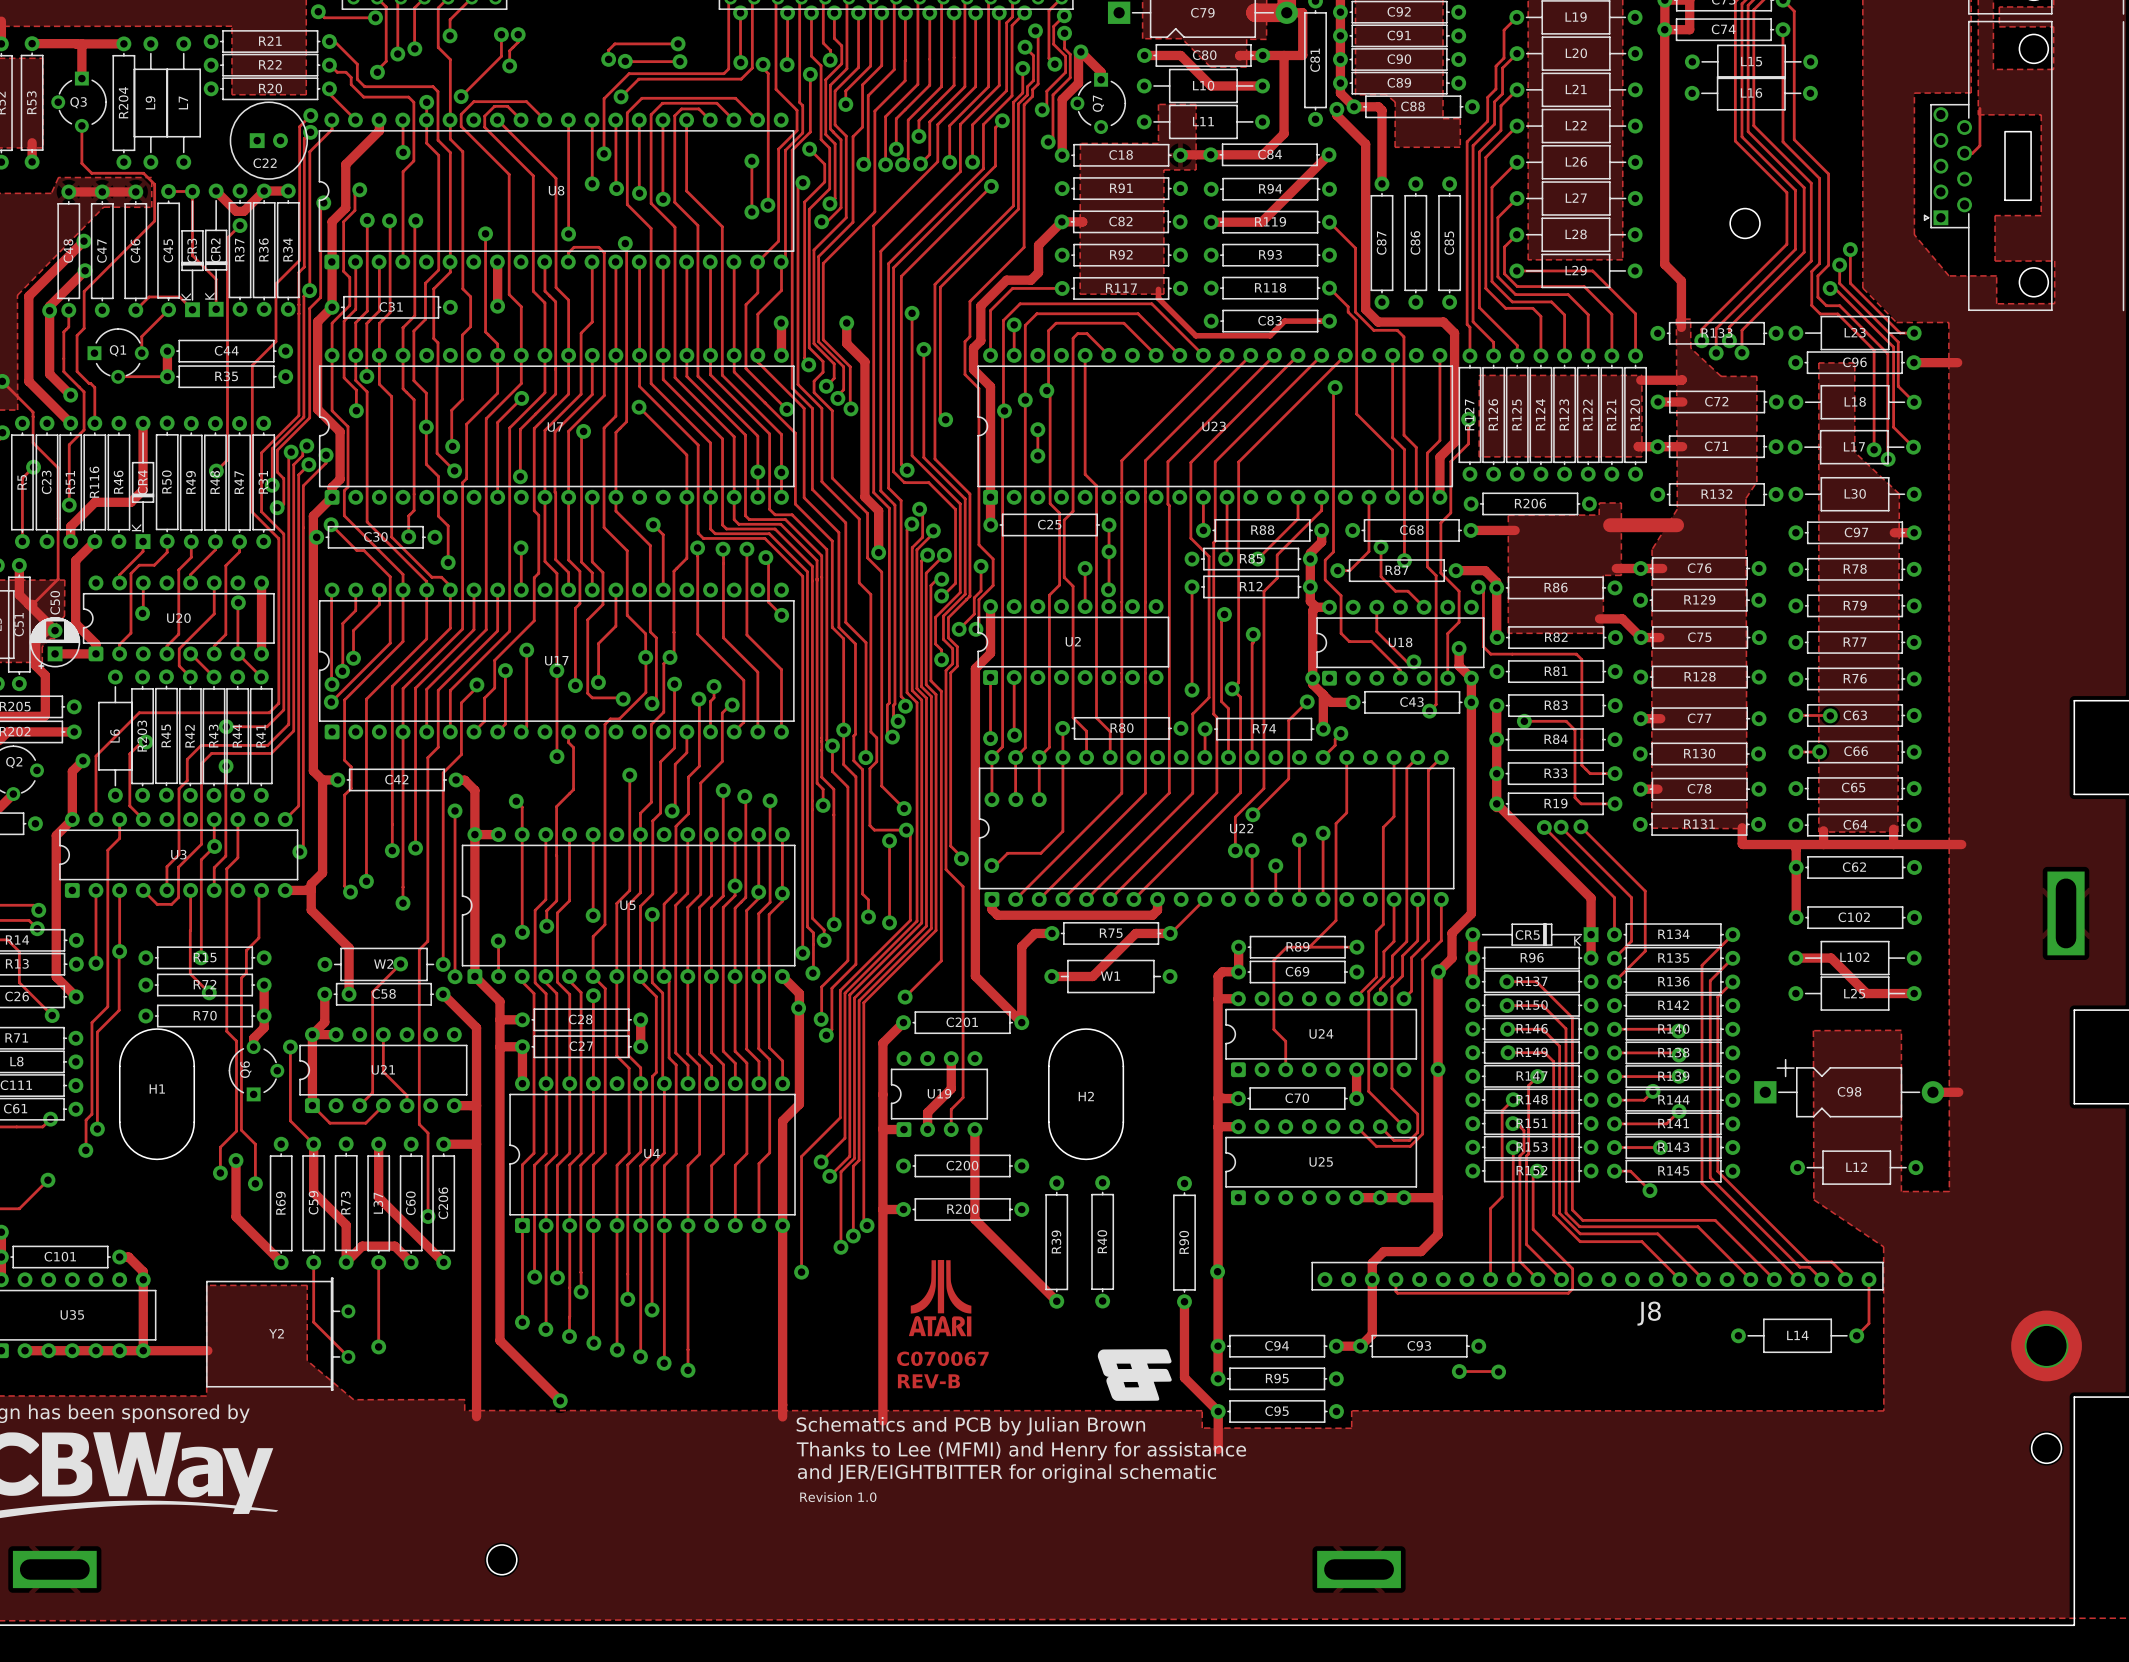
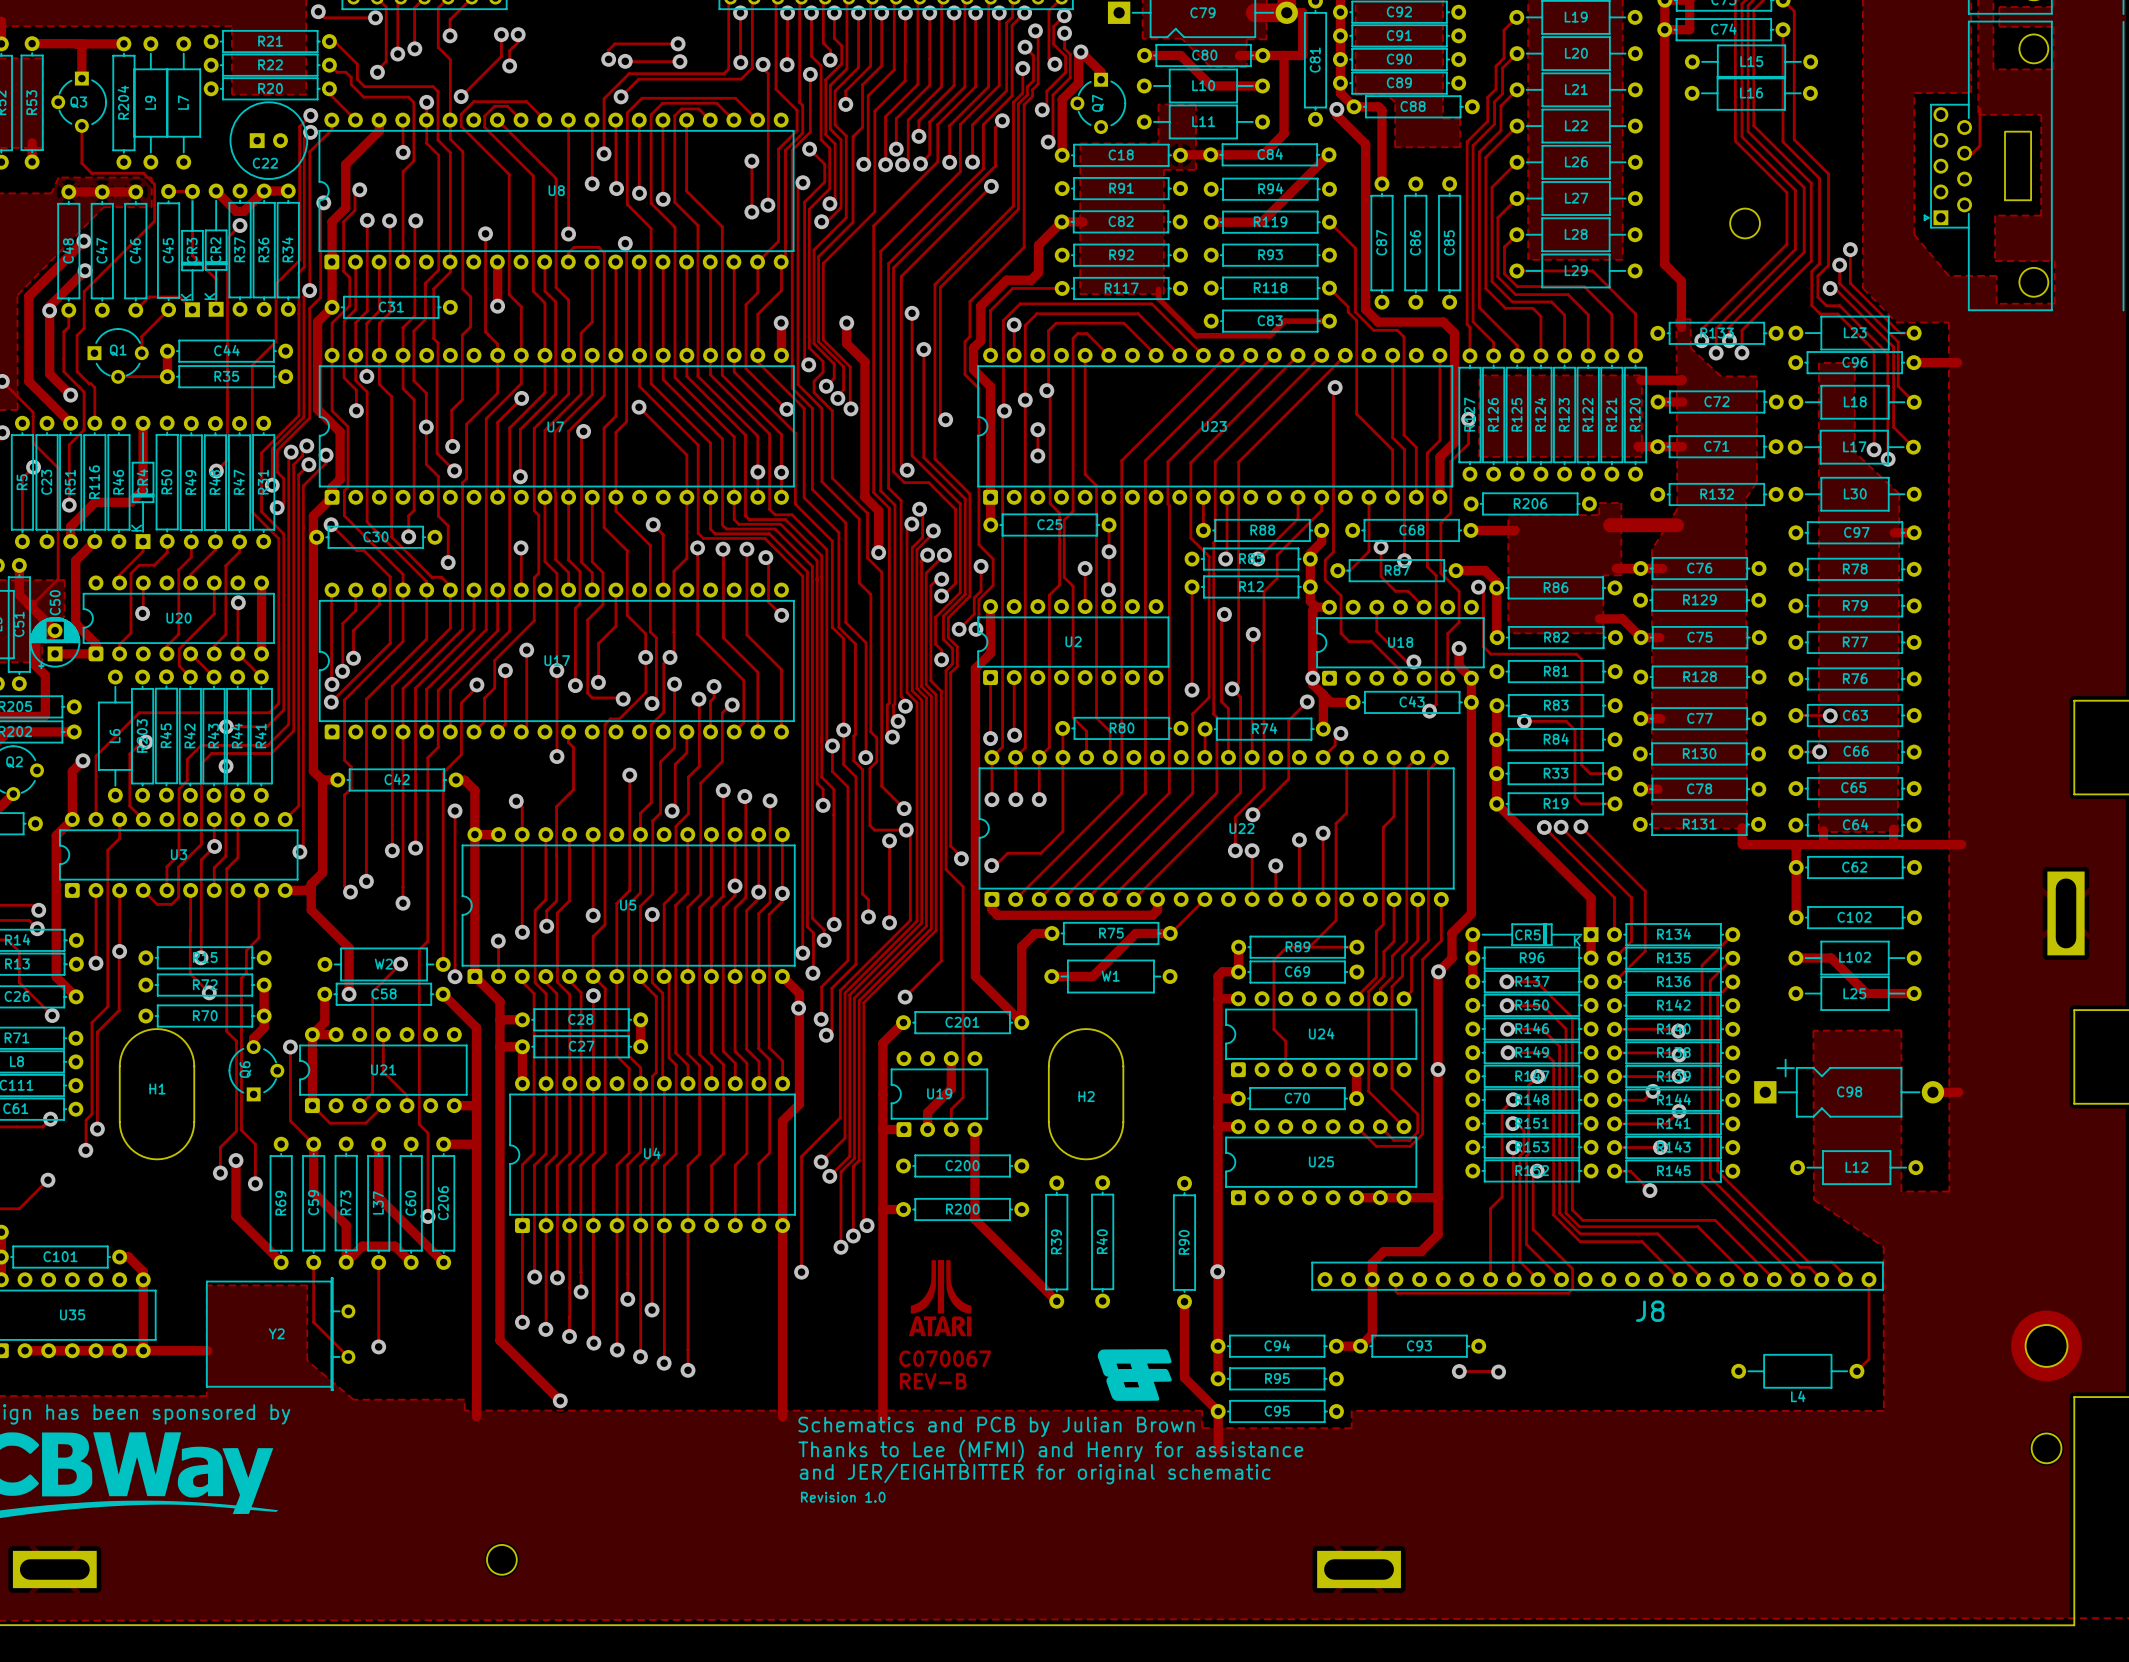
track: (1868, 1323) (1856, 1335) -> (1868, 1323) (1868, 1359) (1856, 1371)
L14: (1797, 1335) -> none
L4: none -> (1797, 1371)

